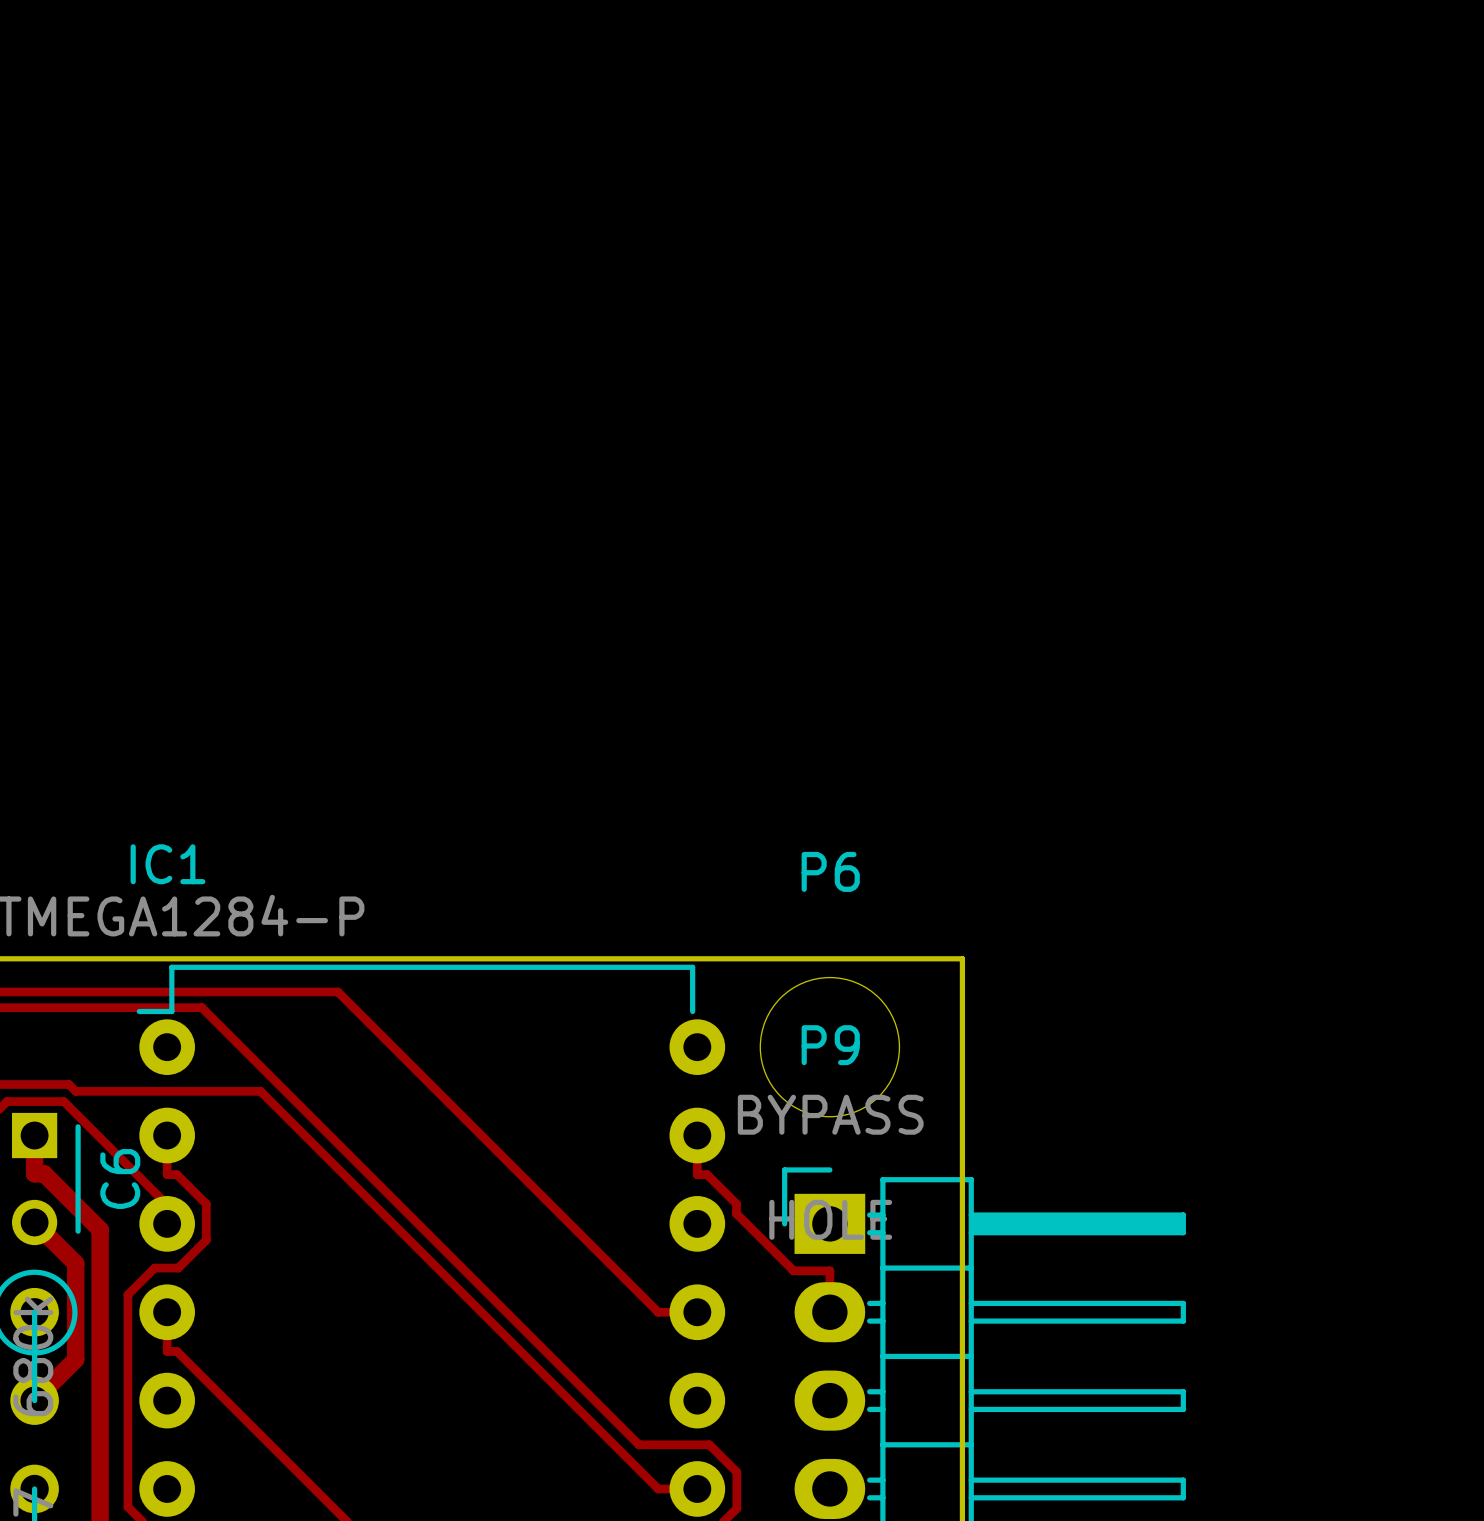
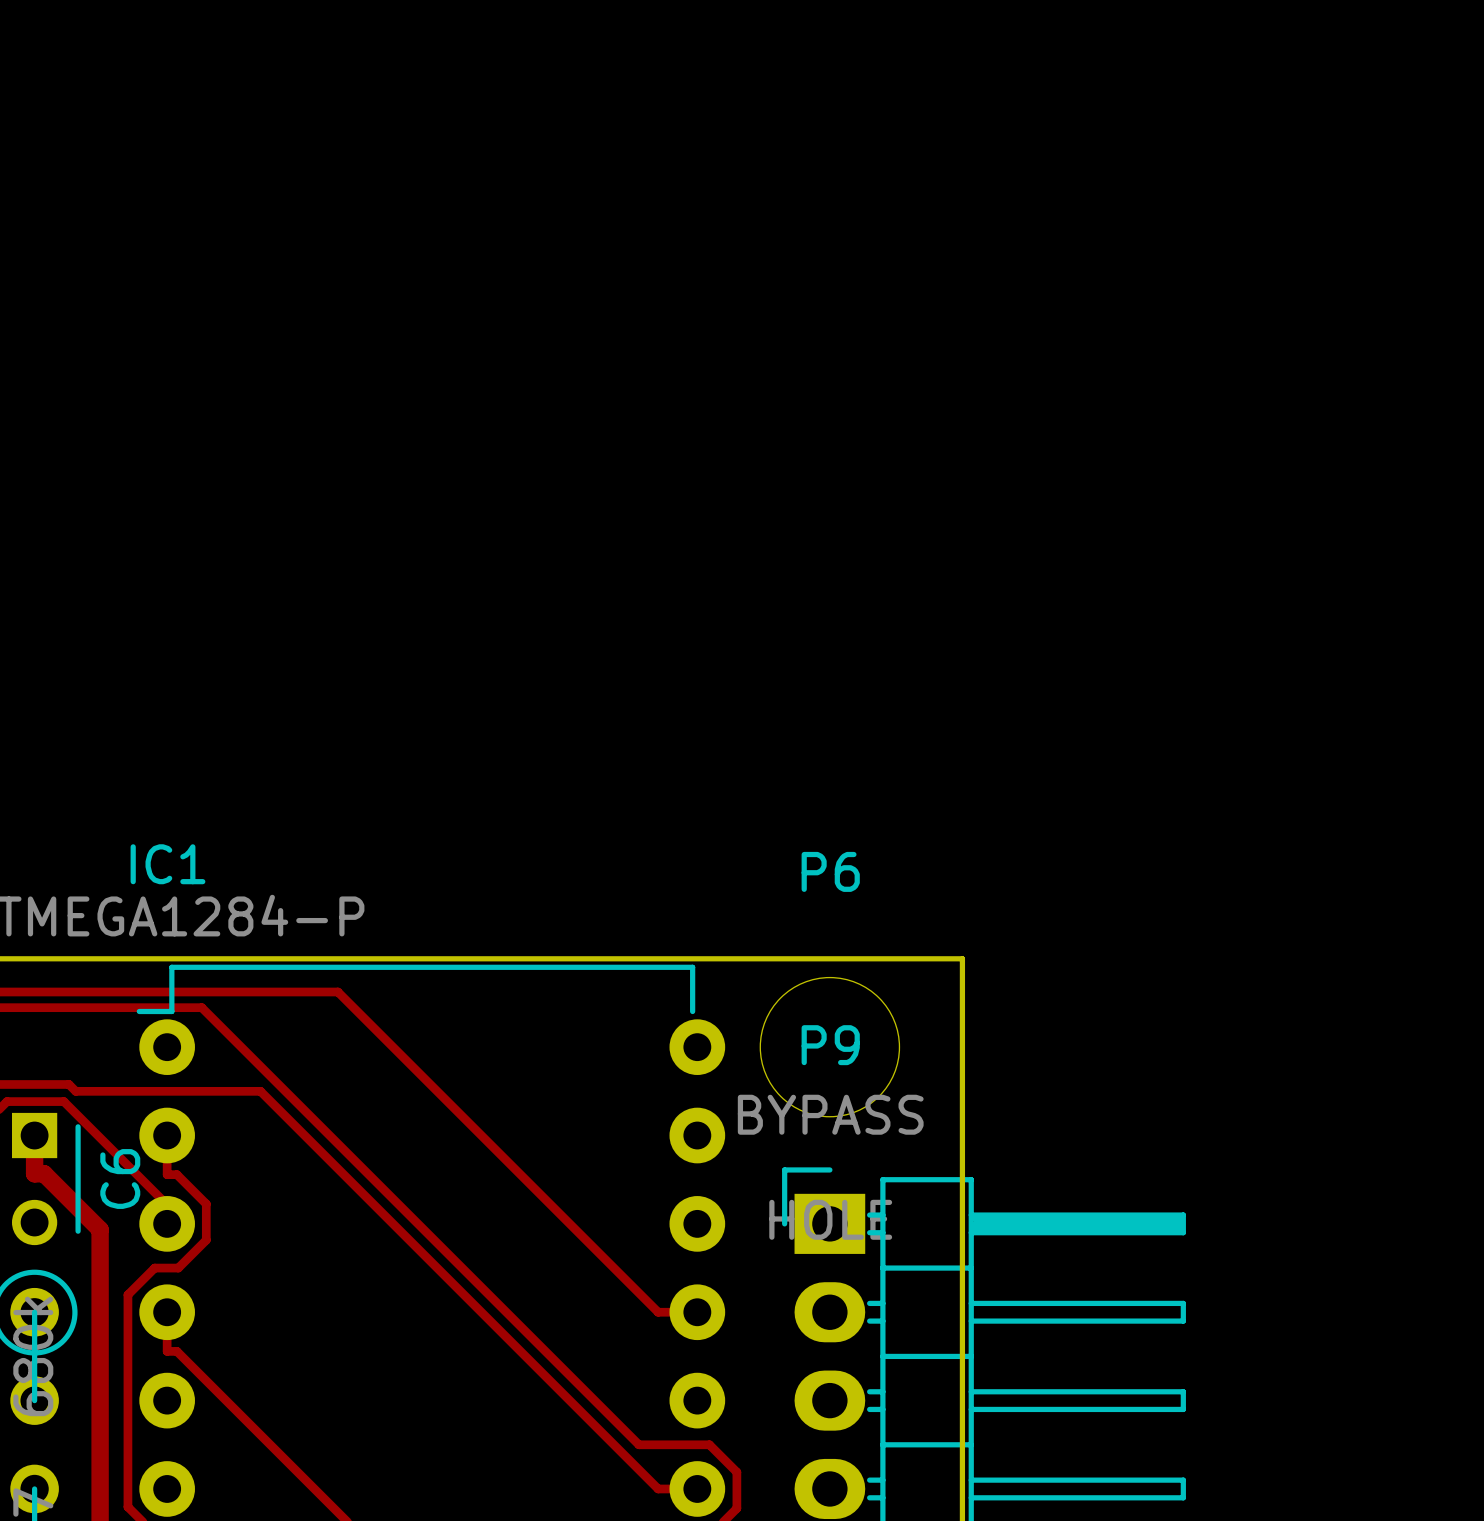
track: (697, 1135) (697, 1174) (707, 1174) (736, 1203) (736, 1213) (793, 1270) (829, 1270) (829, 1312) -> none
track: (34, 1222) (75, 1263) (75, 1359) (34, 1400) -> none

